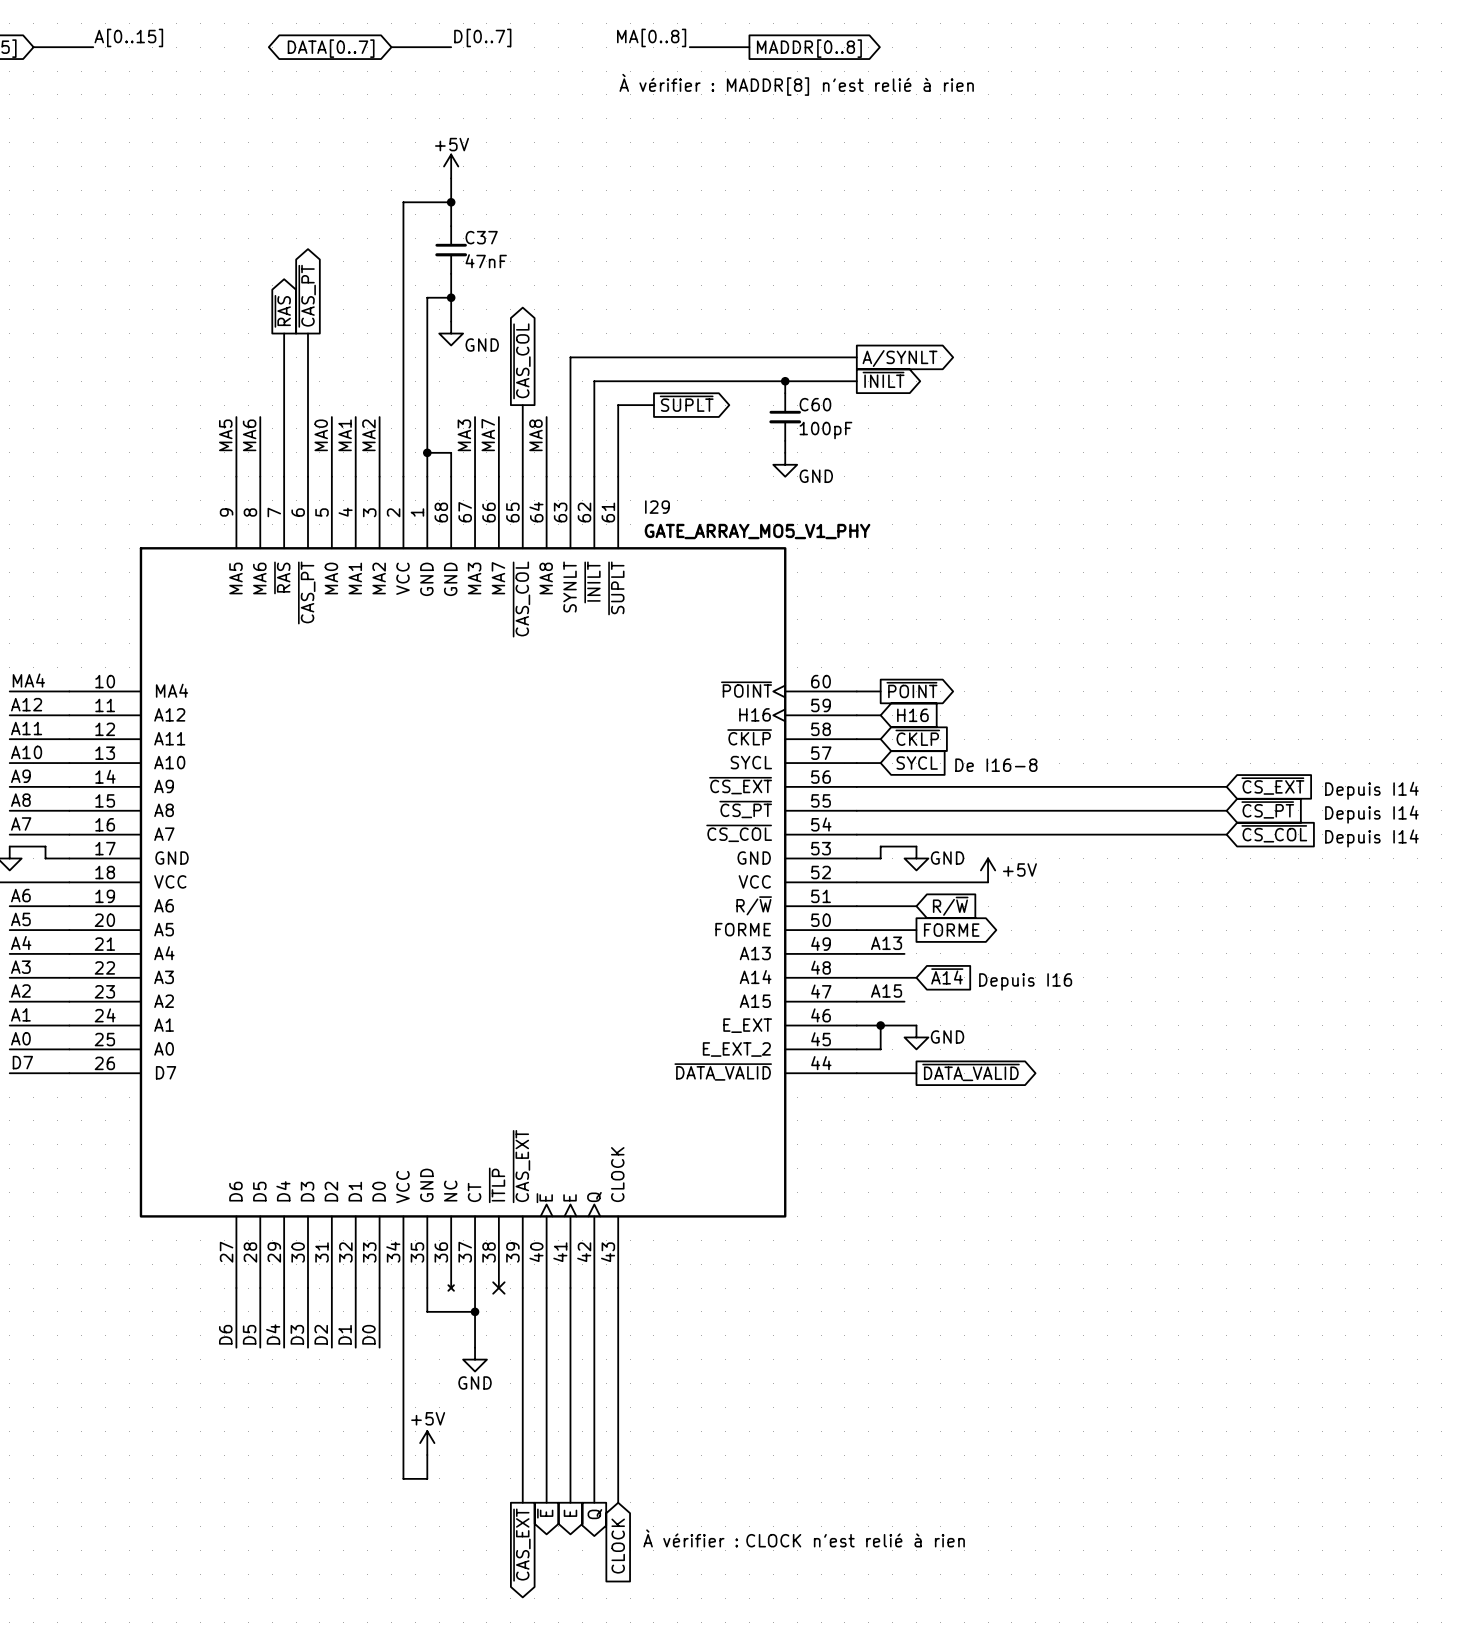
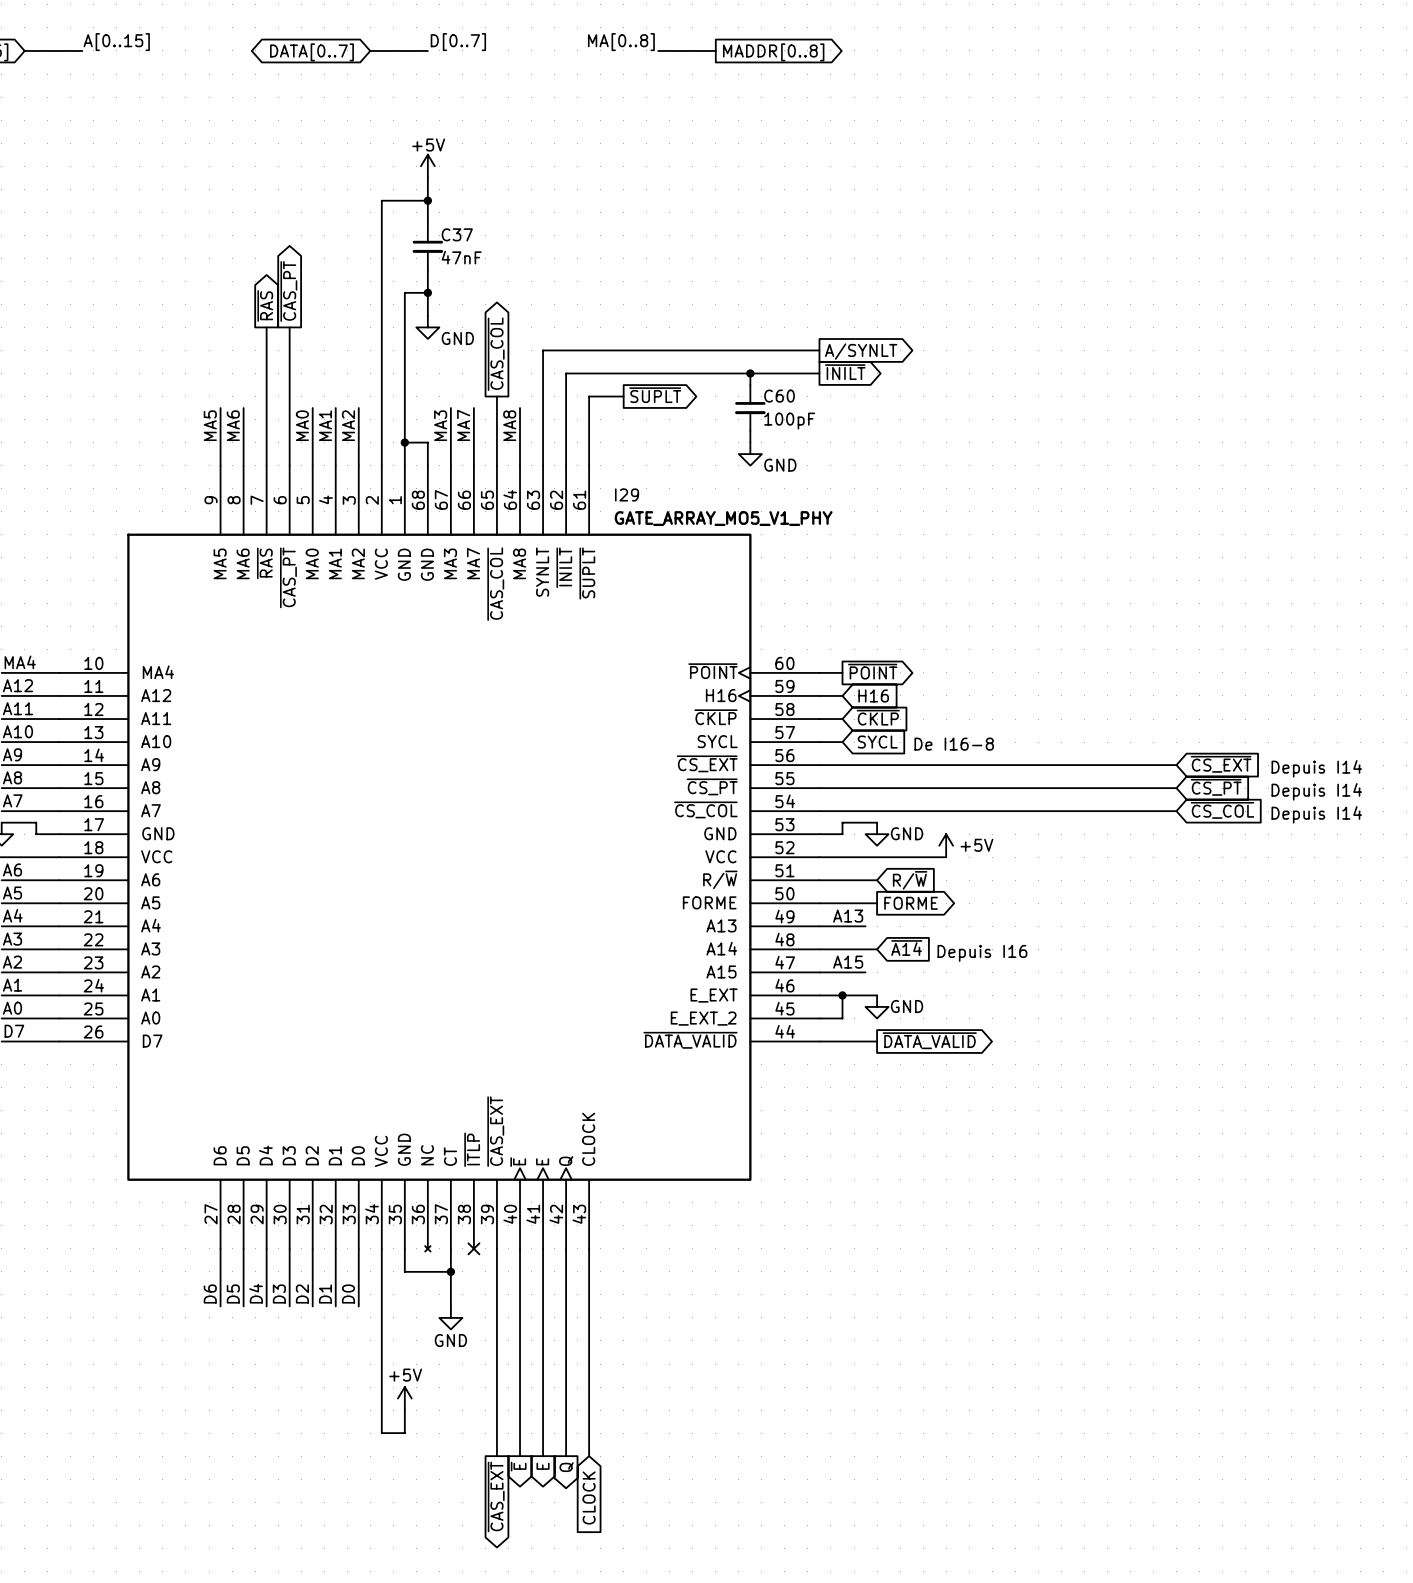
text: À vérifier : MADDR[8] n'est relié à rien (796, 84) -> none
text: À vérifier : CLOCK n'est relié à rien (804, 1538) -> none

